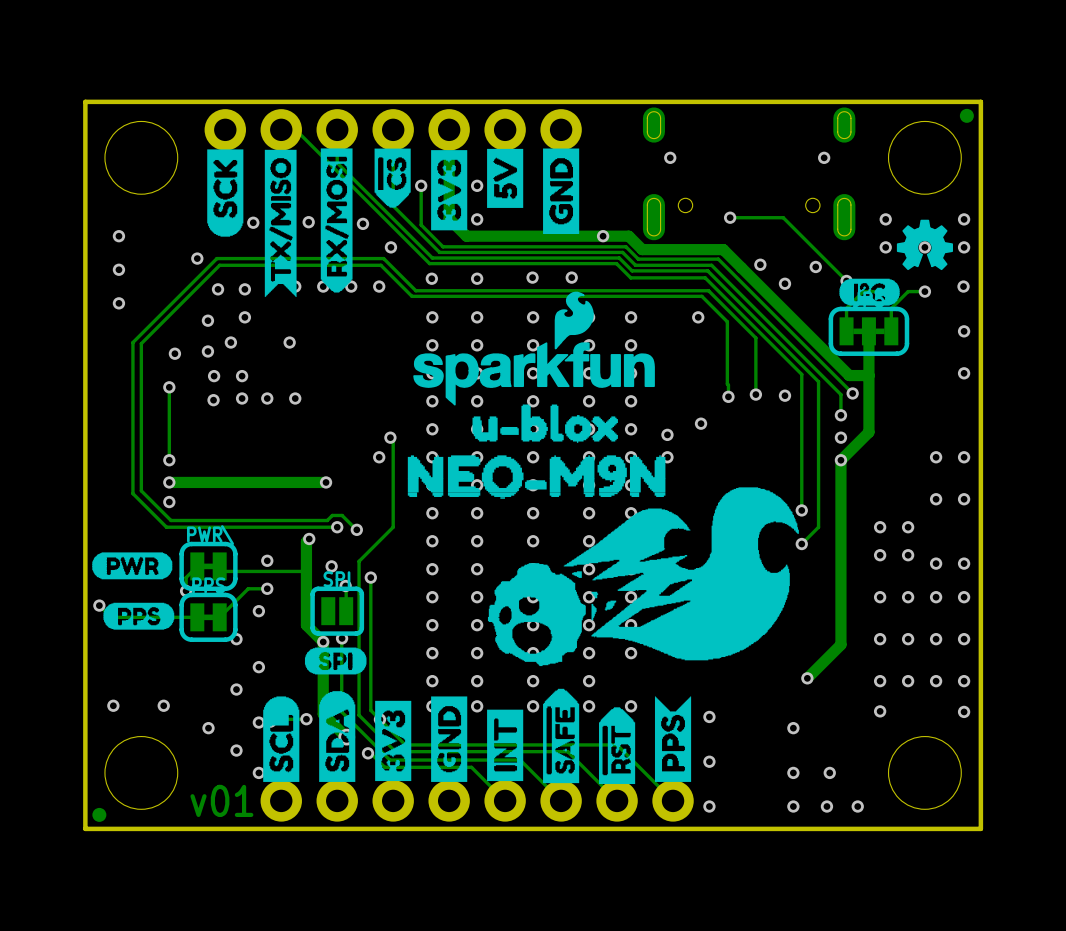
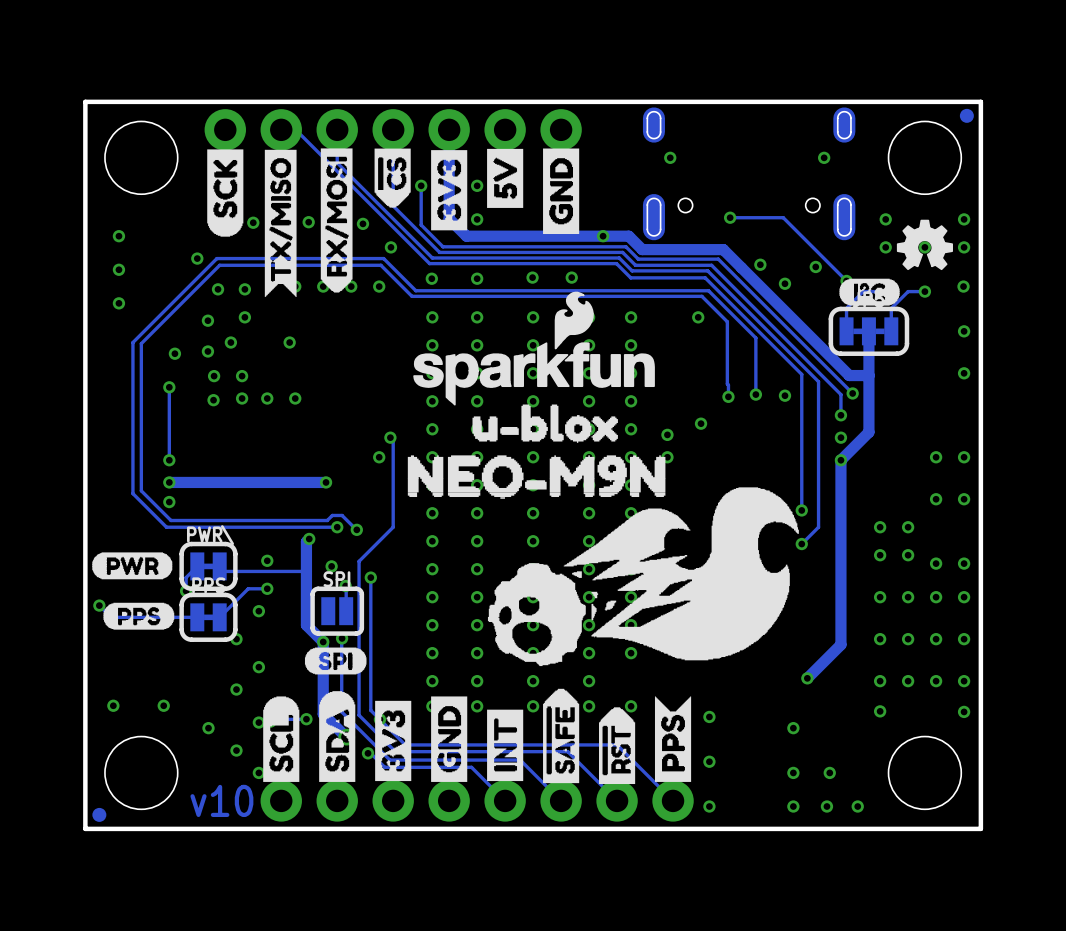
text: v01 (221, 800) -> v10 (221, 800)

